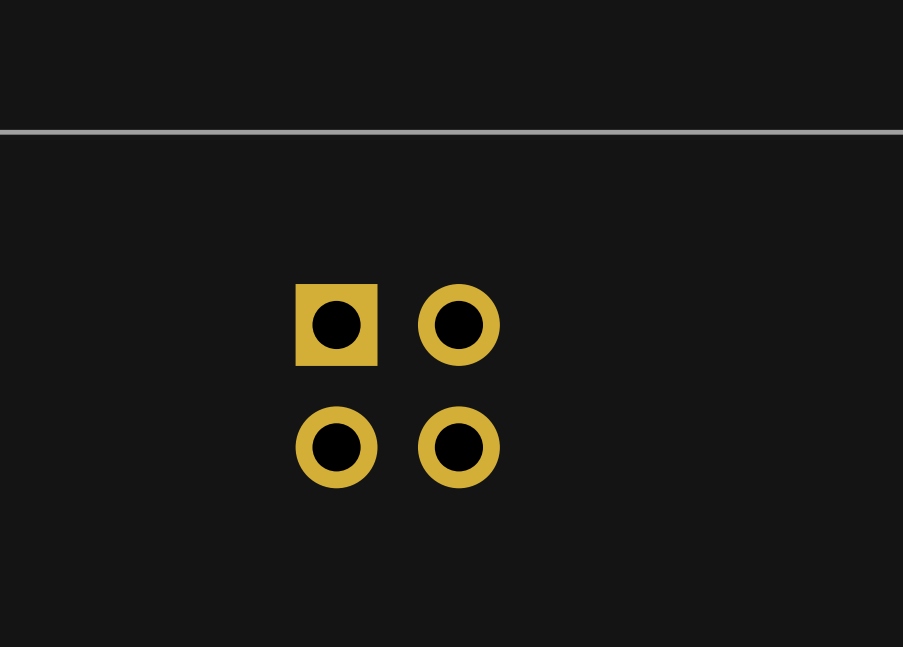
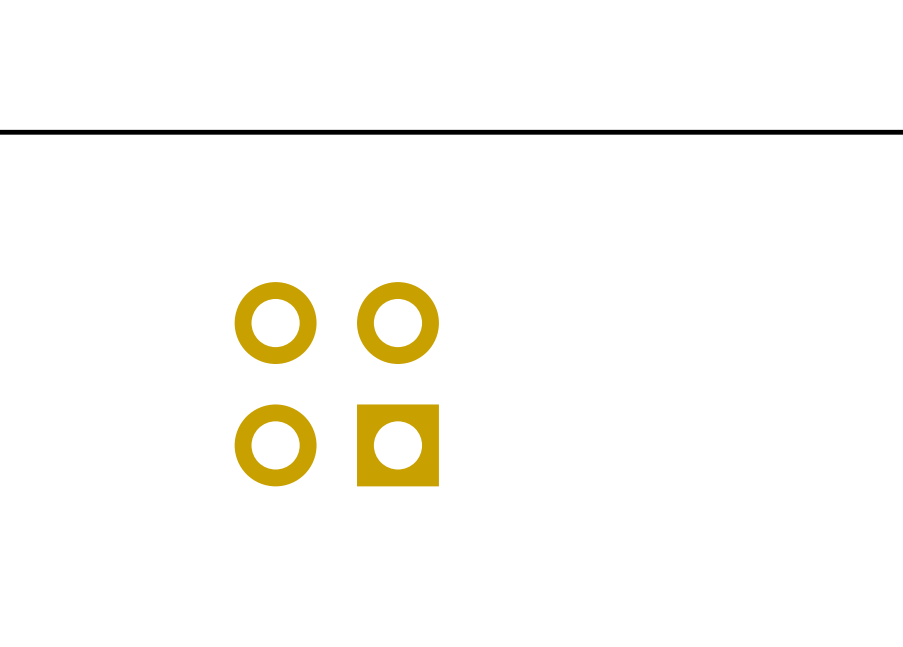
part rotation: 0° (397, 386) -> 180° (336, 384)

